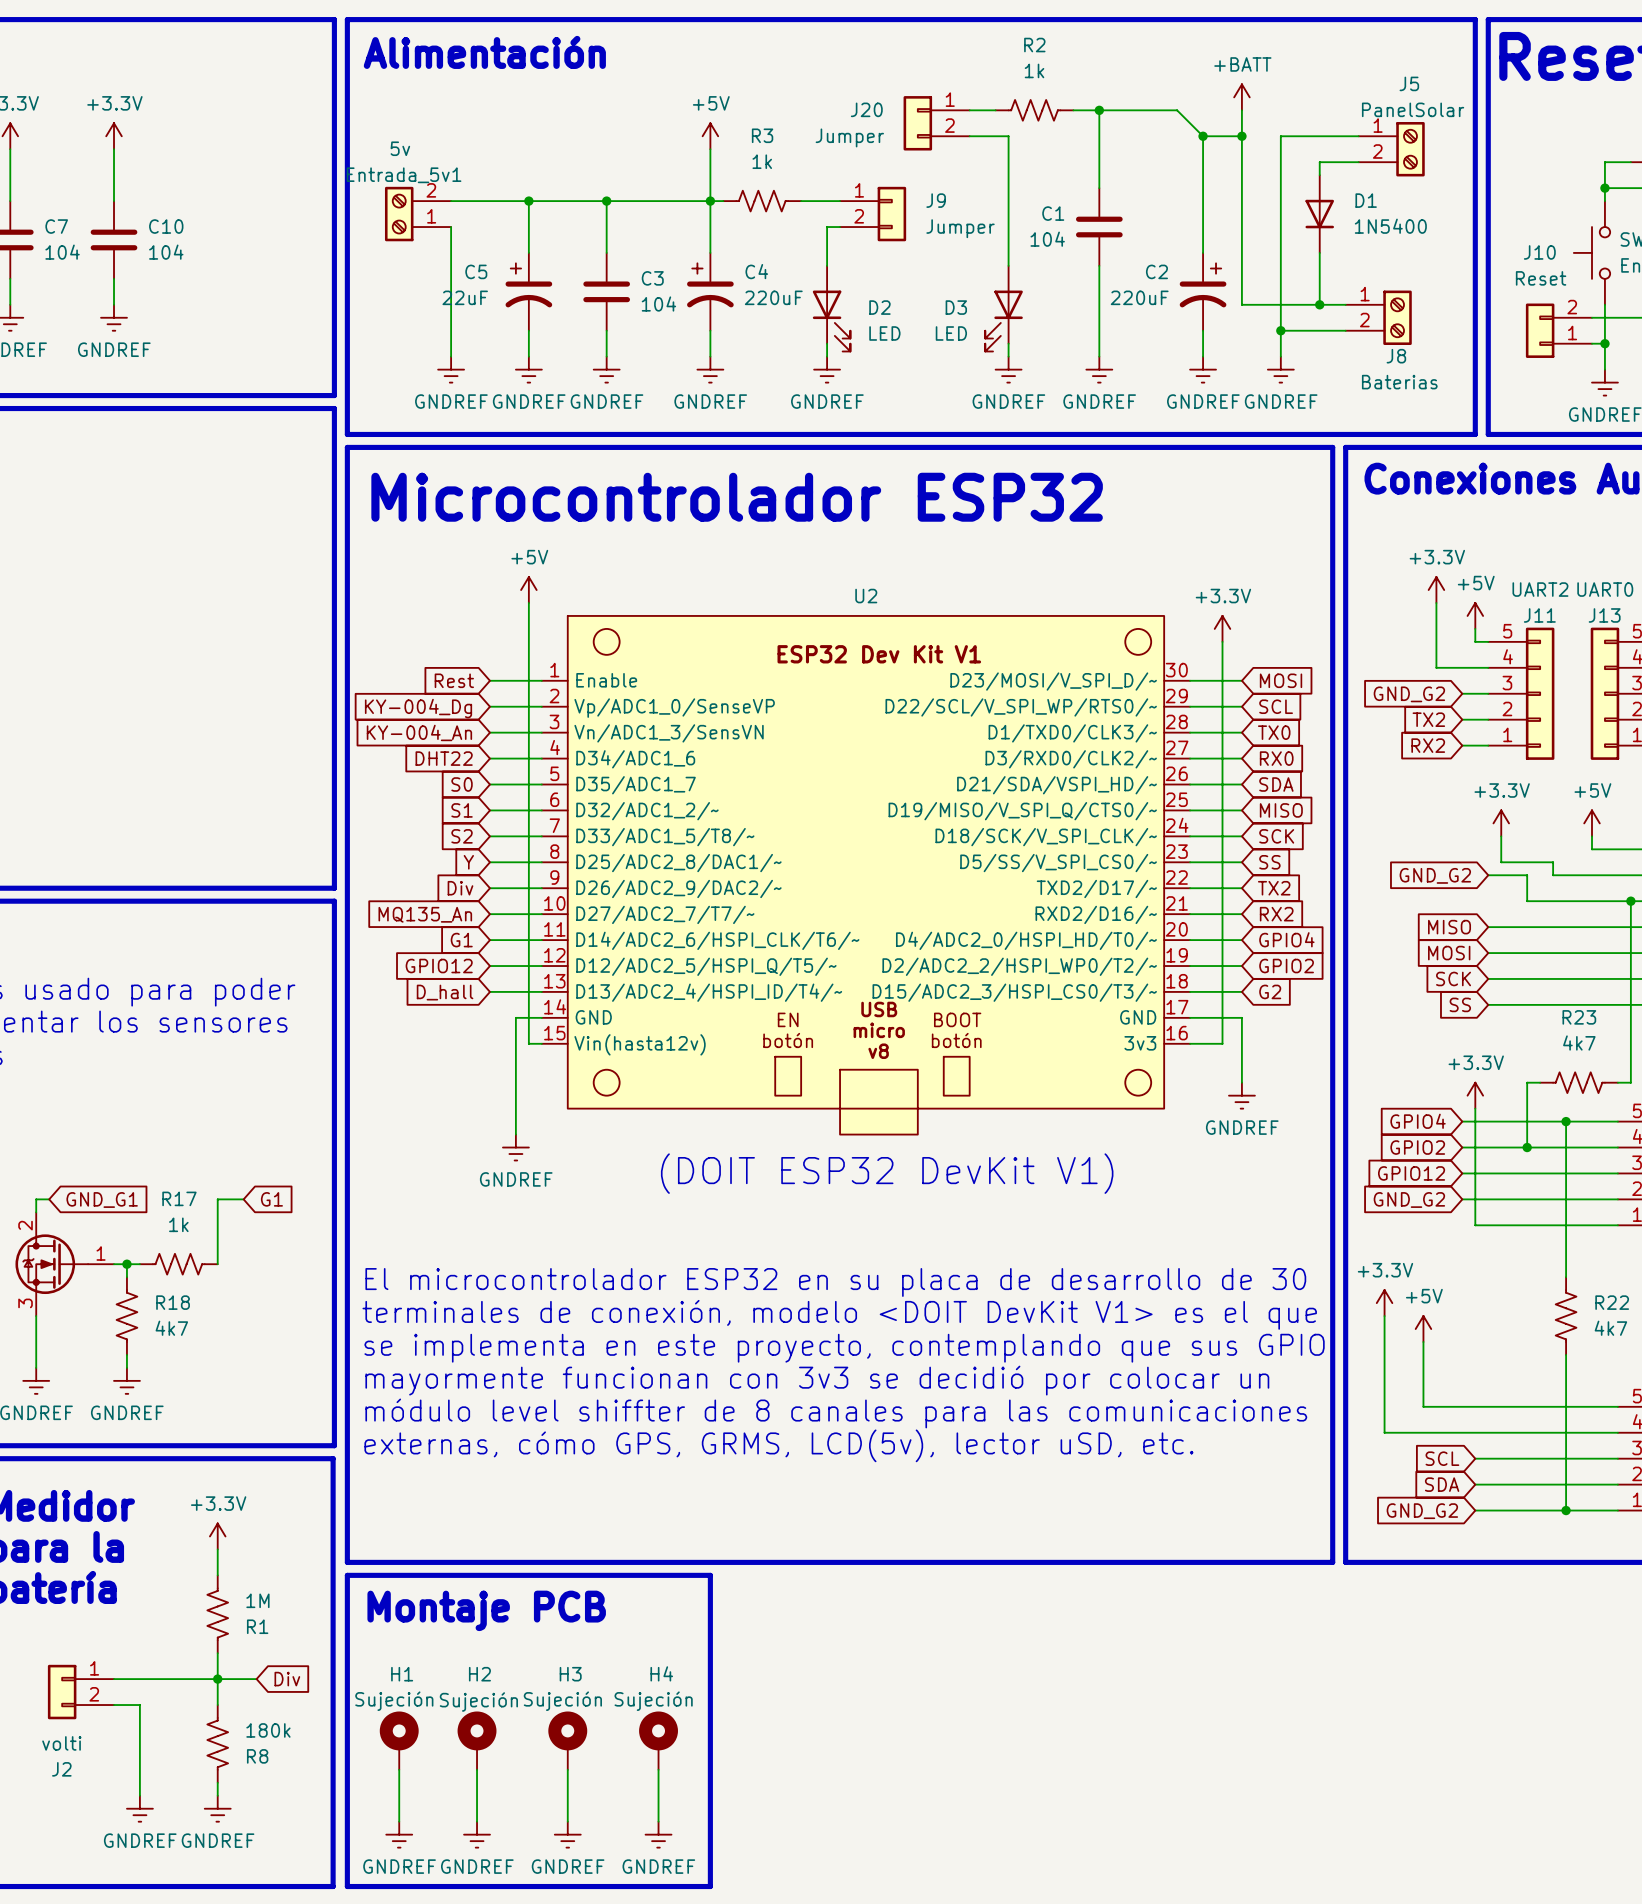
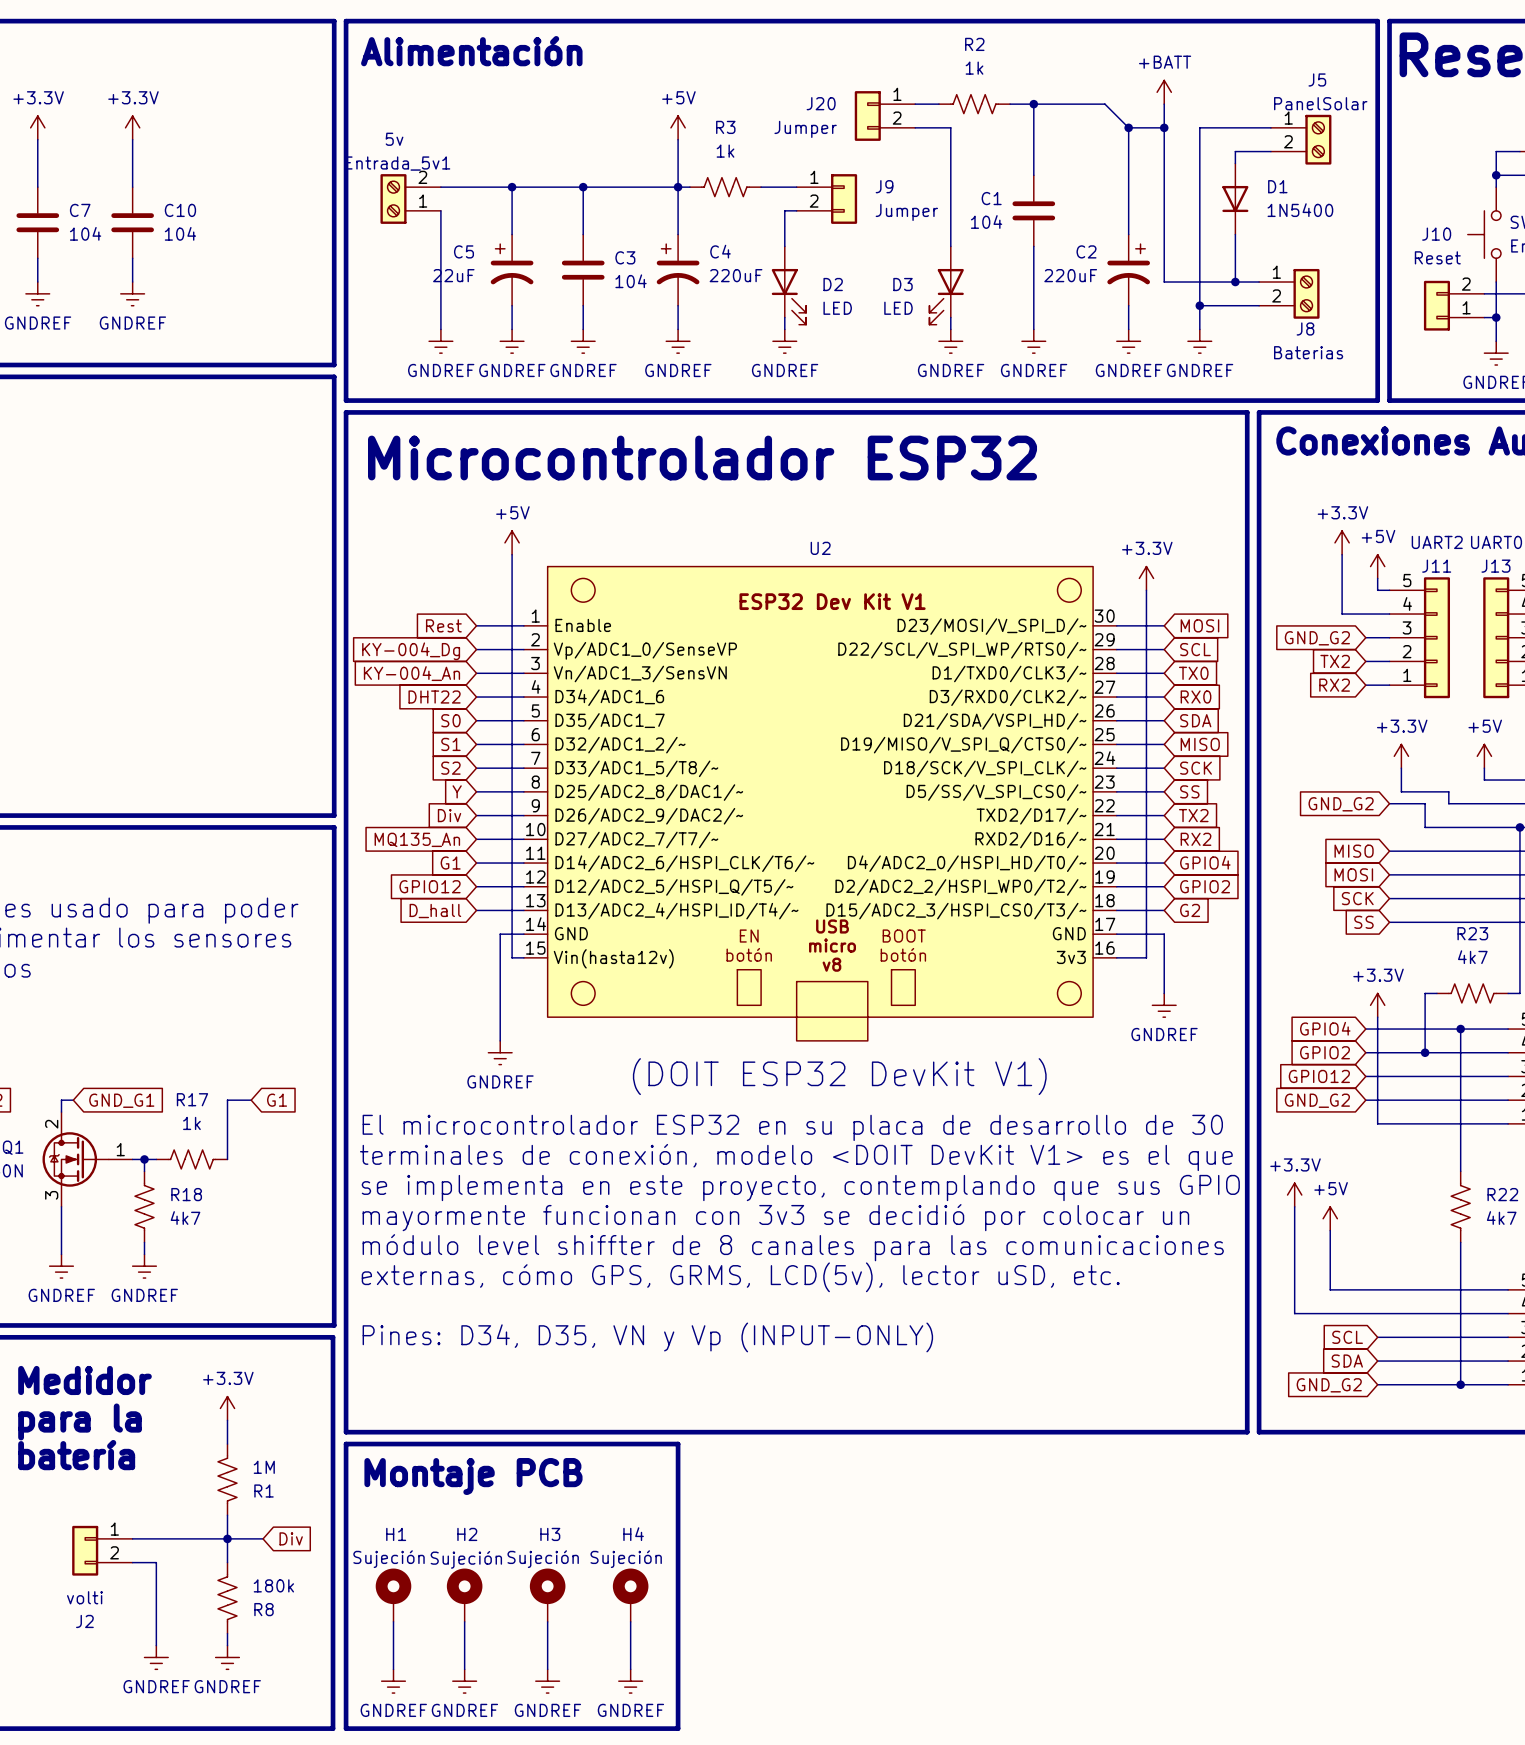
text position: El microcontrolador ESP32 en su placa de desarrollo de 30 (835, 1282) -> El microcontrolador ESP32 en su placa de desarrollo de 30 (792, 1127)
text position: terminales de conexión, modelo <DOIT DevKit V1> es el que (839, 1314) -> terminales de conexión, modelo <DOIT DevKit V1> es el que (796, 1157)
text position: se implementa en este proyecto, contemplando que sus GPIO (844, 1348) -> se implementa en este proyecto, contemplando que sus GPIO (800, 1188)
text position: mayormente funcionan con 3v3 se decidió por colocar un (817, 1380) -> mayormente funcionan con 3v3 se decidió por colocar un (775, 1217)
text position: módulo level shiffter de 8 canales para las comunicaciones (836, 1413) -> módulo level shiffter de 8 canales para las comunicaciones (793, 1247)
text position: externas, cómo GPS, GRMS, LCD(5v), lector uSD, etc. (778, 1445) -> externas, cómo GPS, GRMS, LCD(5v), lector uSD, etc. (740, 1277)
text: none -> Pines: D34, D35, VN y Vp (INPUT-ONLY) (647, 1337)

